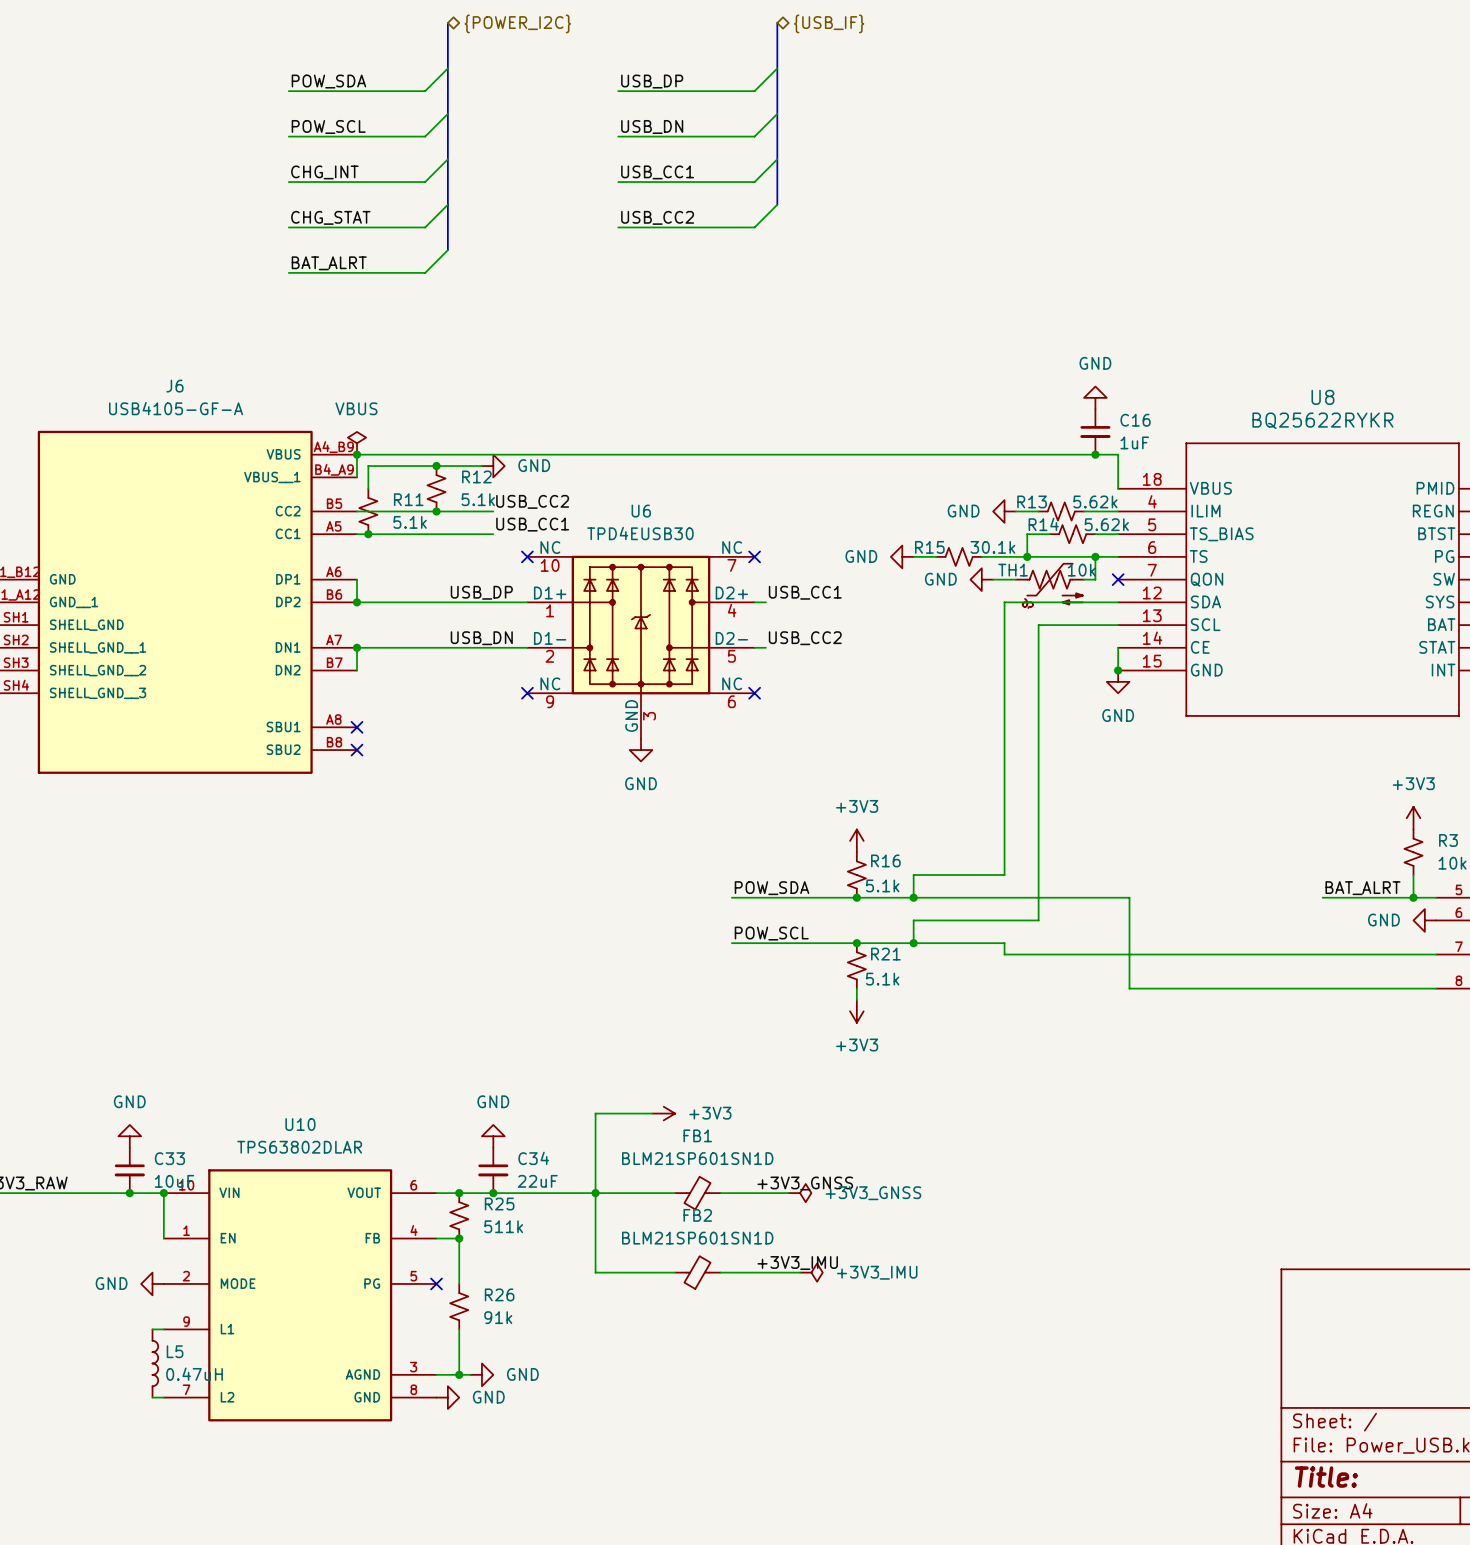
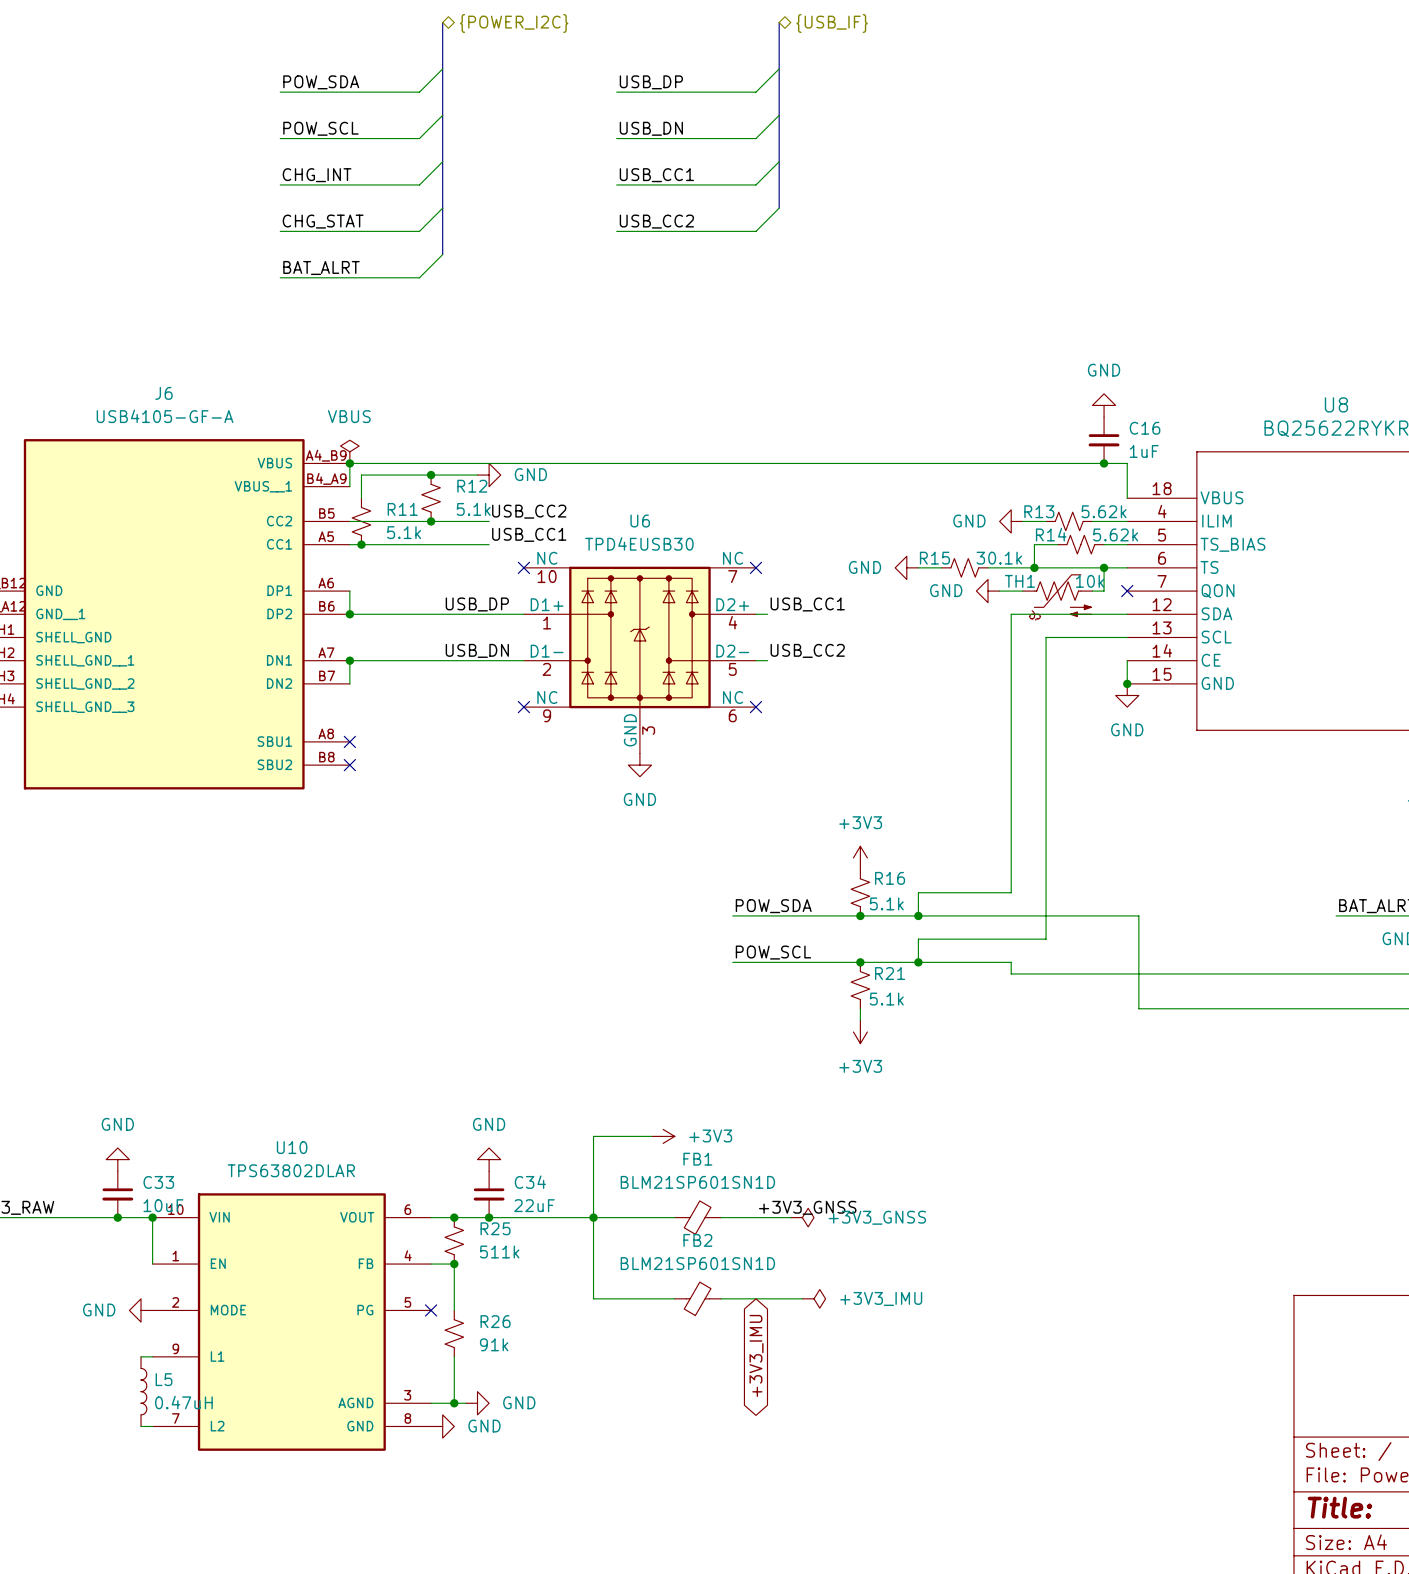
label: +3V3_IMU (797, 1263) -> none
global label: none -> +3V3_IMU (756, 1355)

